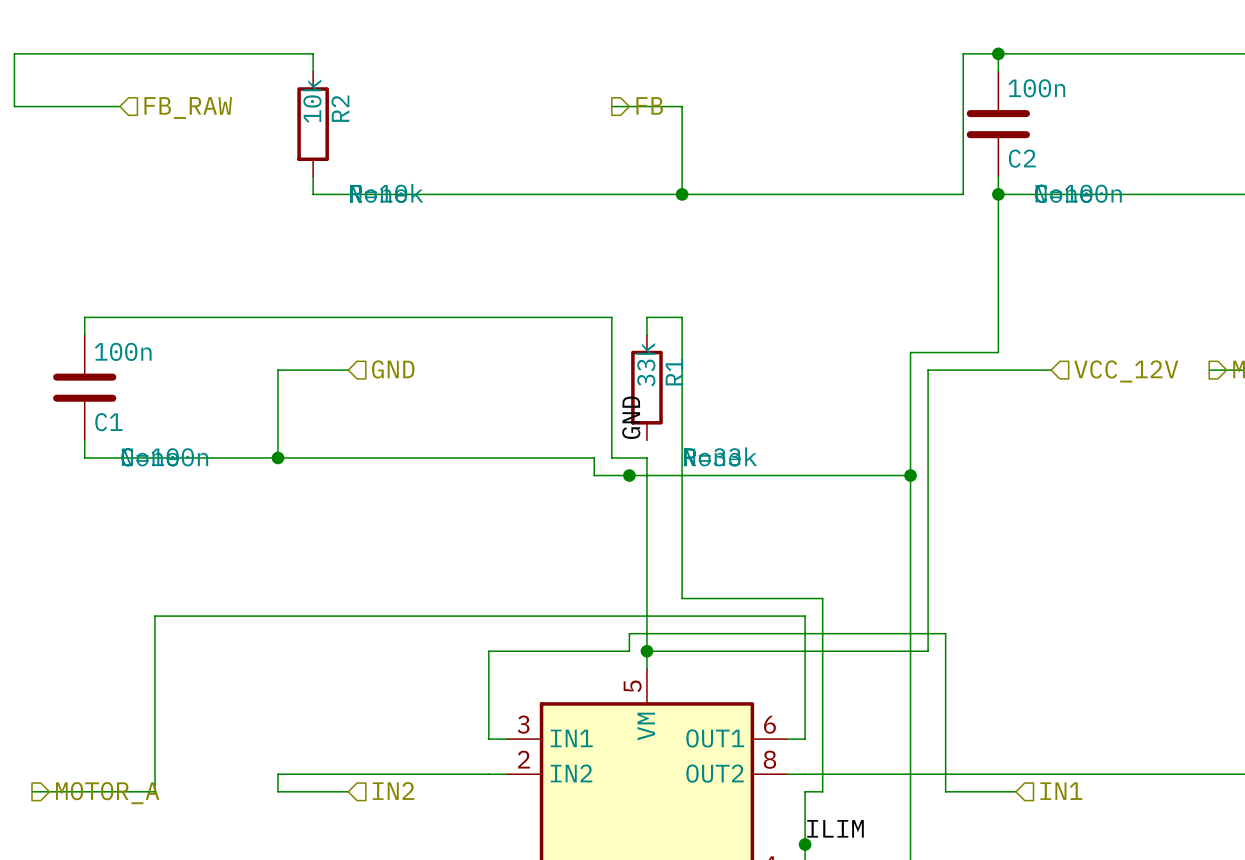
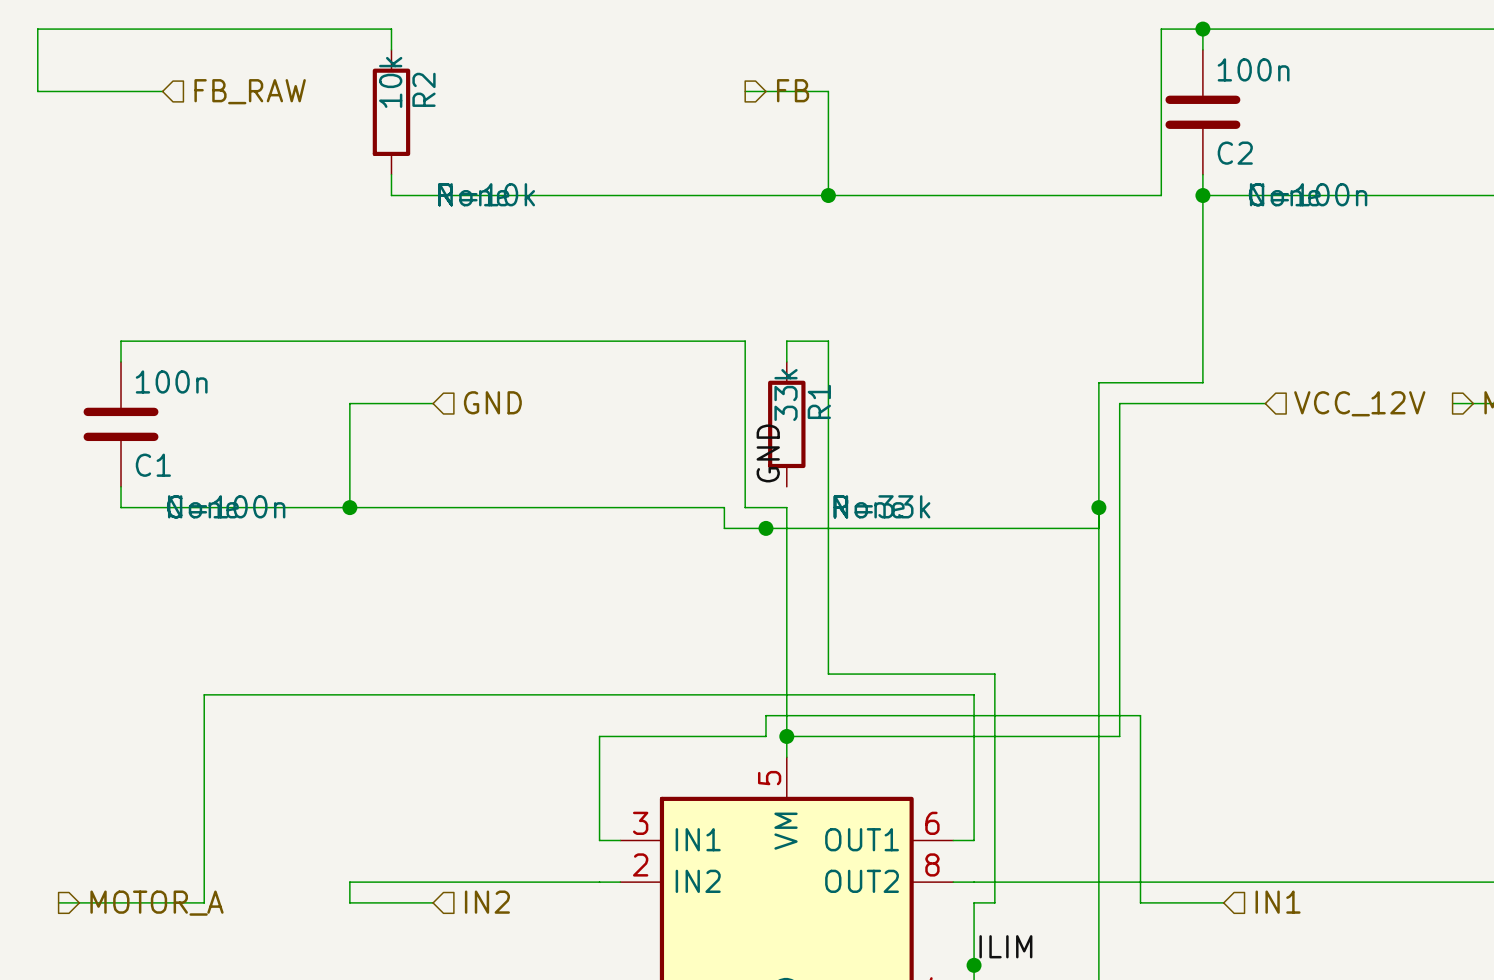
junction position: (910, 475) -> (1098, 507)

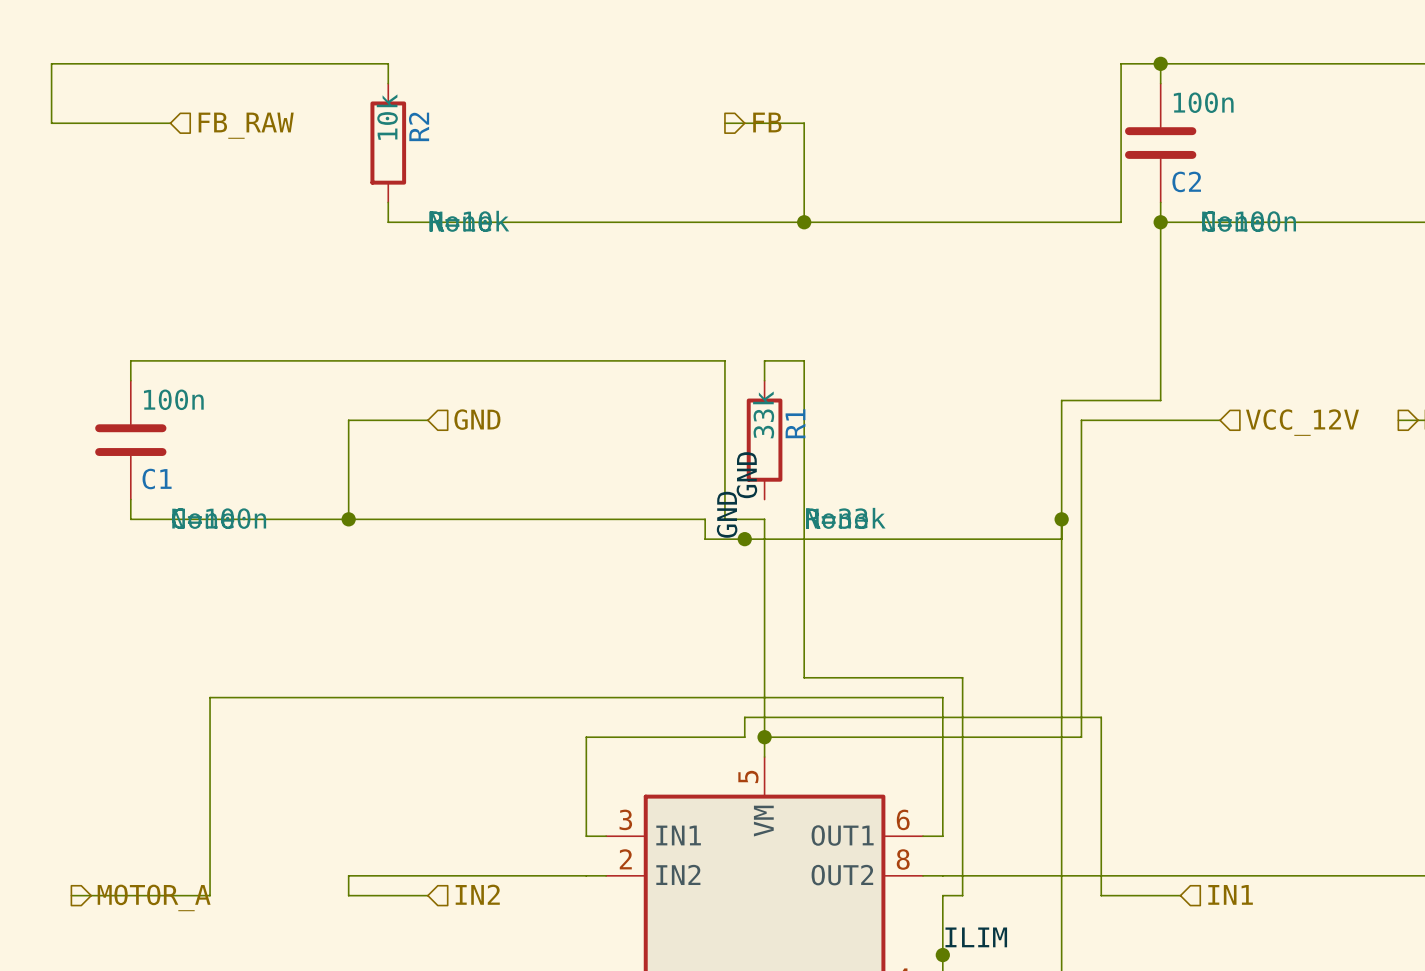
label: none -> GND (727, 514)

